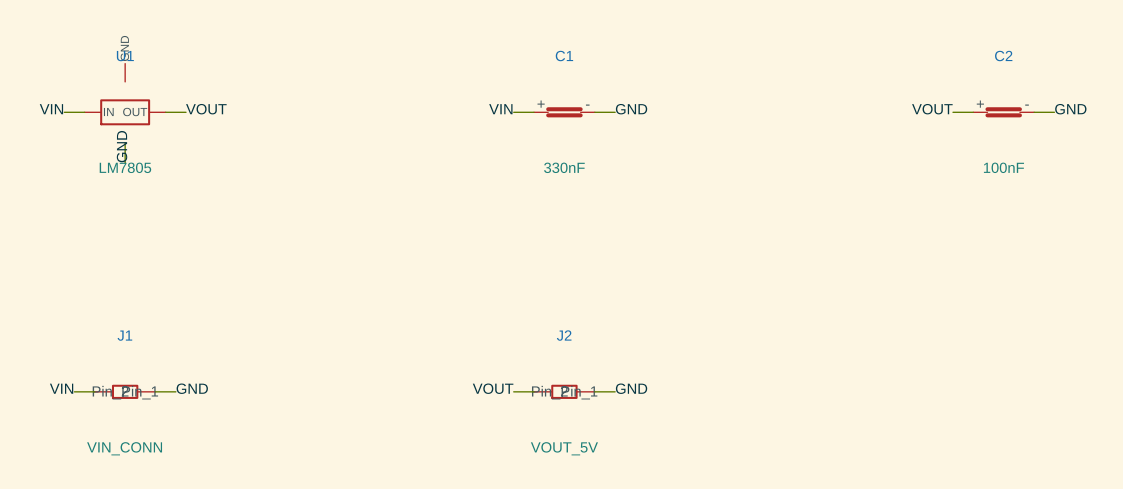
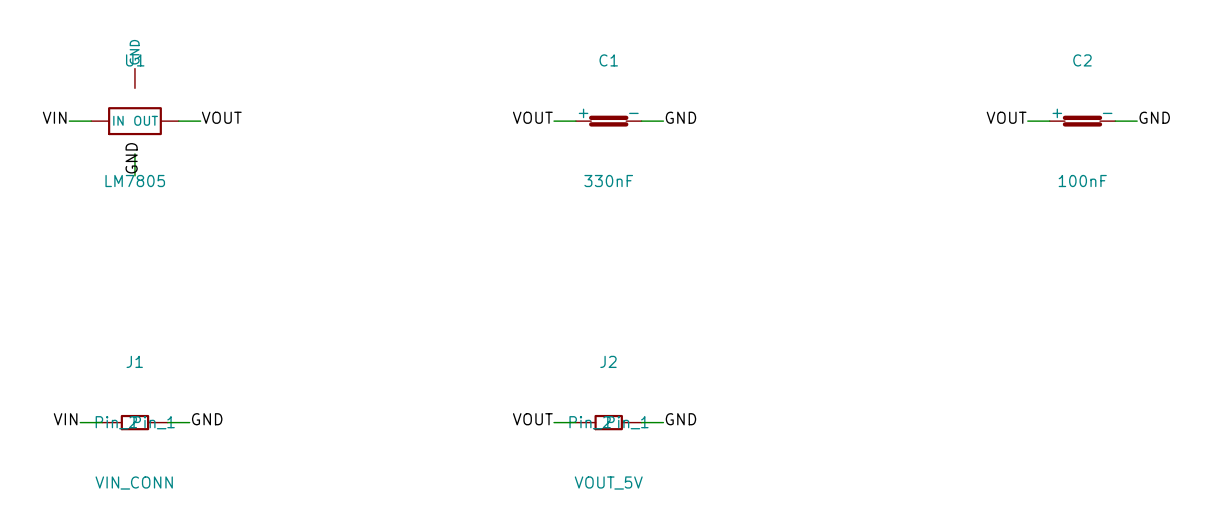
label: VIN (500, 109) -> VOUT (532, 117)

